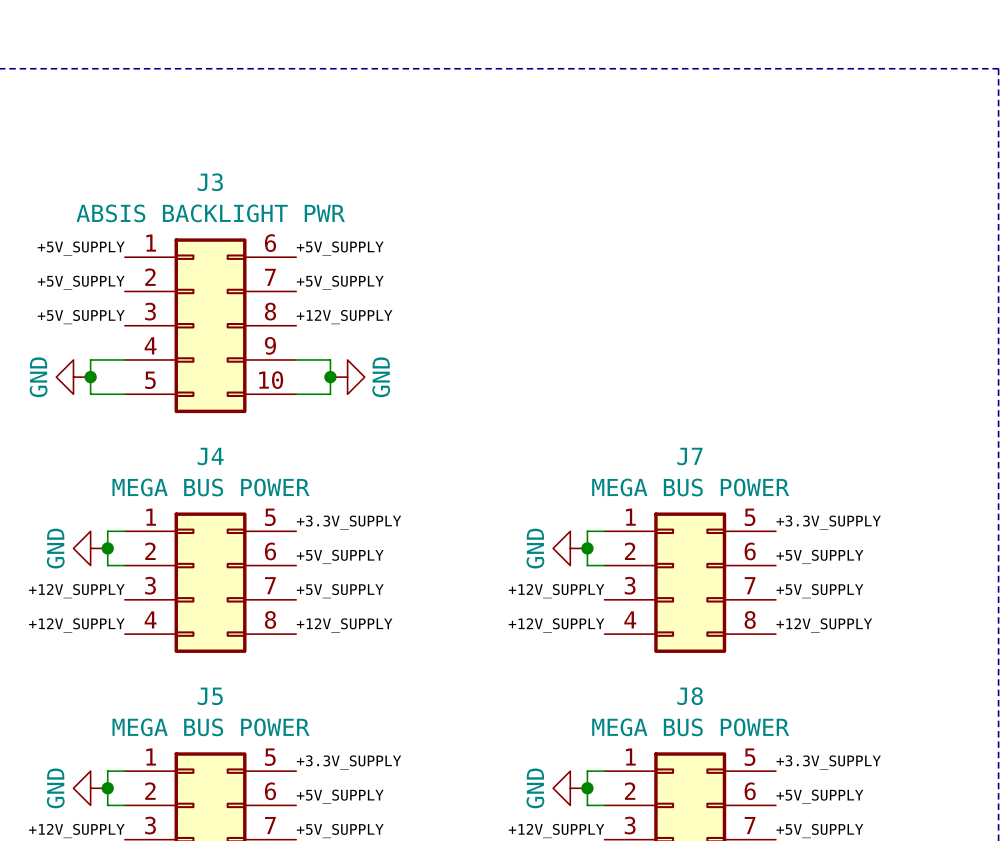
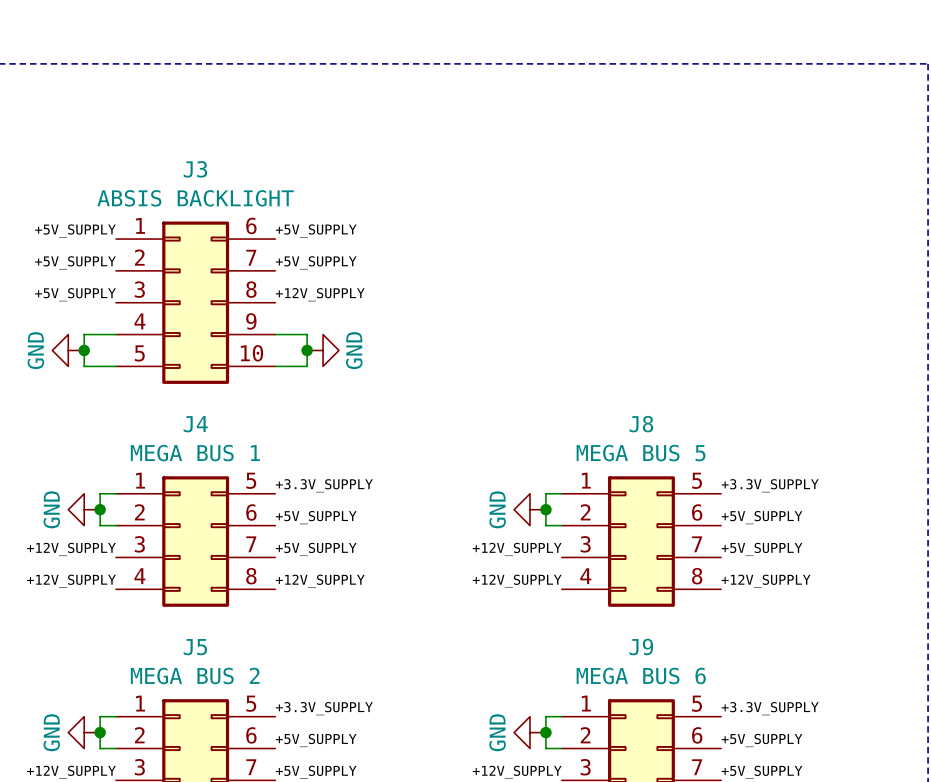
J3 value: ABSIS BACKLIGHT PWR (210, 213) -> ABSIS BACKLIGHT (195, 198)
J7 name: J7 (689, 456) -> J8 (641, 424)
J4 value: MEGA BUS POWER (211, 487) -> MEGA BUS 1 (195, 453)
J7 value: MEGA BUS POWER (690, 487) -> MEGA BUS 5 (641, 453)
J8 name: J8 (690, 696) -> J9 (641, 647)
J5 value: MEGA BUS POWER (211, 727) -> MEGA BUS 2 (195, 675)
J8 value: MEGA BUS POWER (690, 727) -> MEGA BUS 6 (641, 675)

